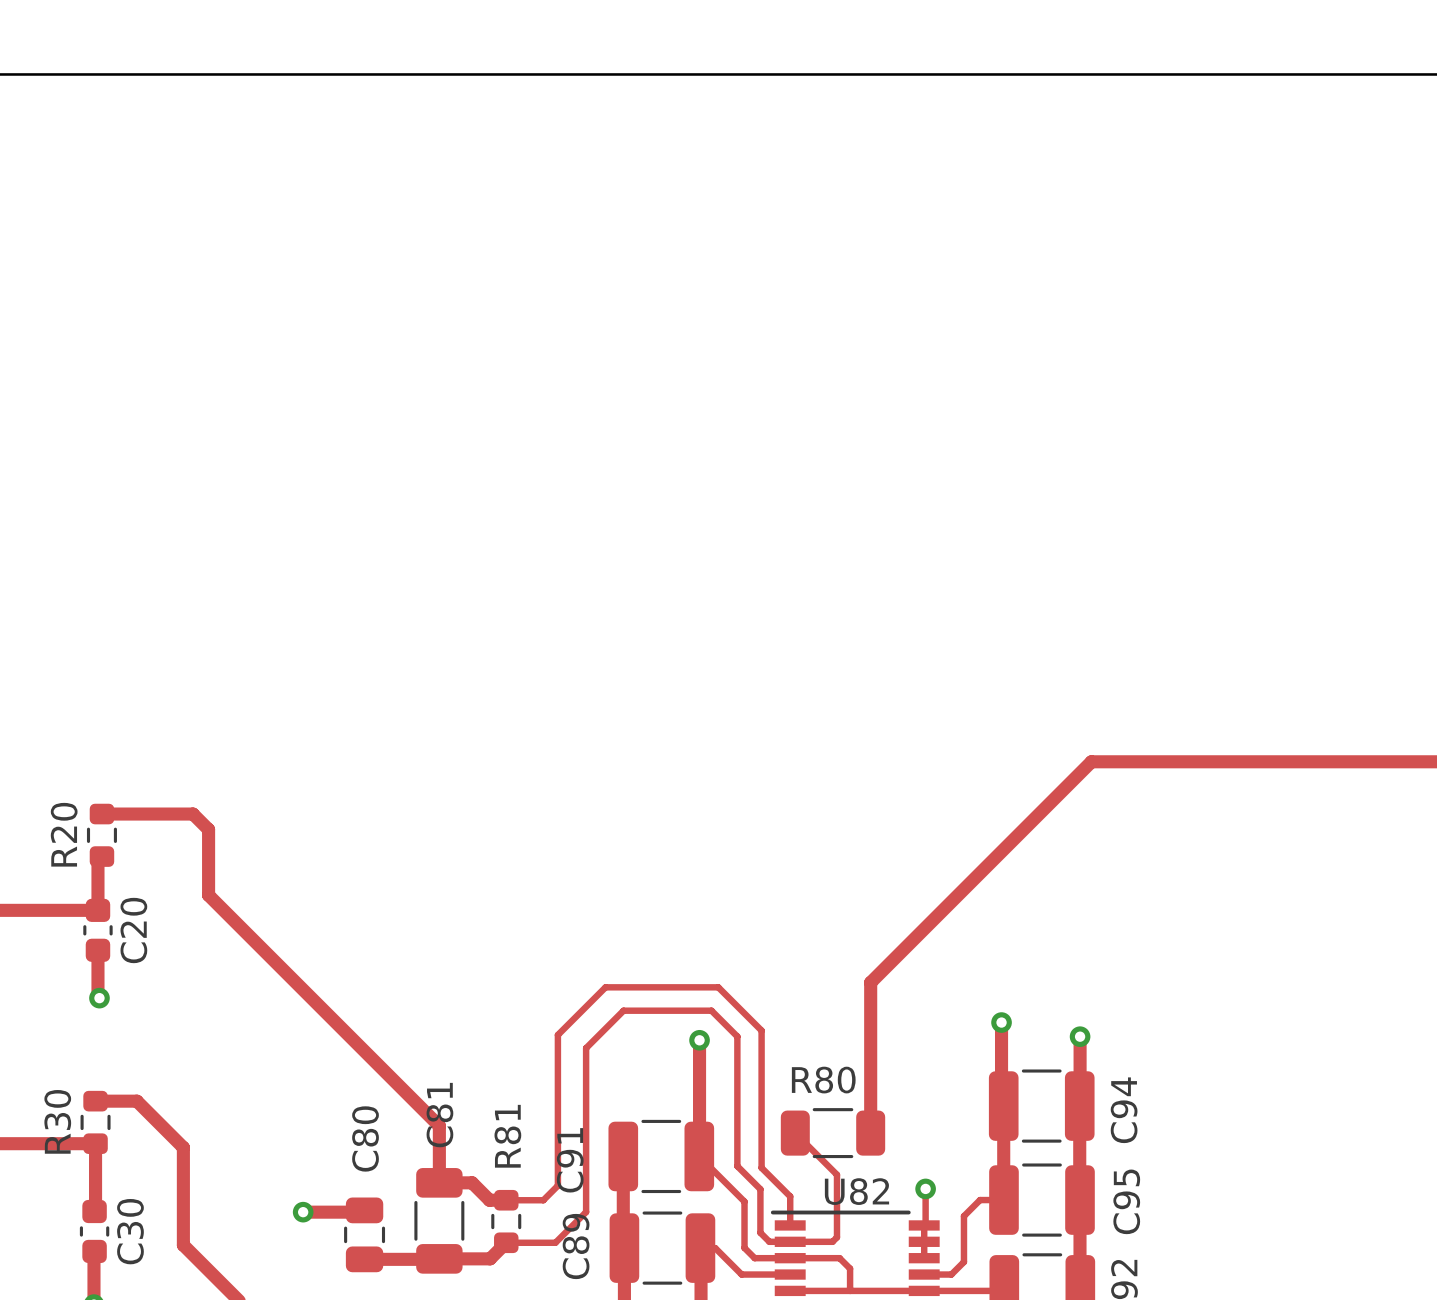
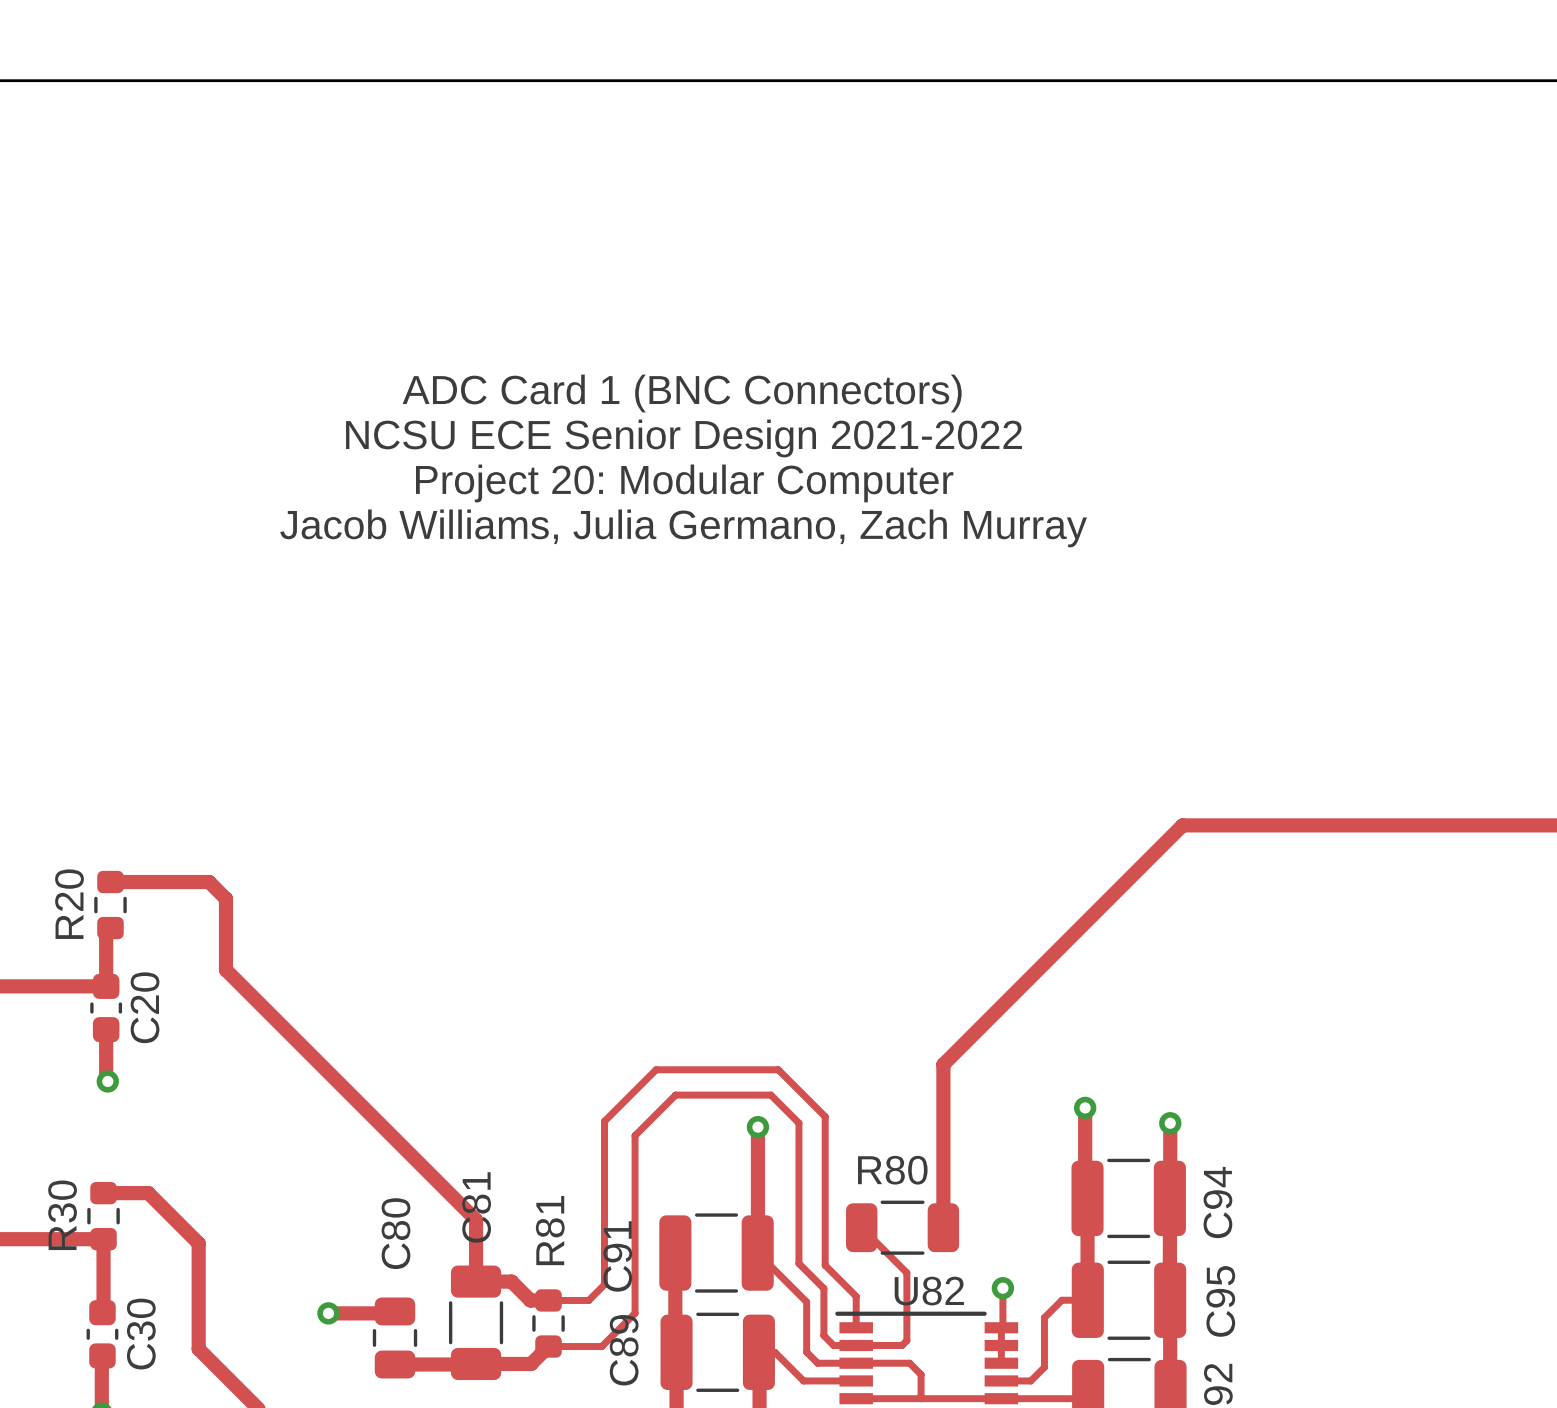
text: none -> ADC Card 1 (BNC Connectors) (682, 393)
text: none -> NCSU ECE Senior Design 2021-2022 (683, 438)
text: none -> Project 20: Modular Computer (684, 483)
text: none -> Jacob Williams, Julia Germano, Zach Murray (683, 528)

